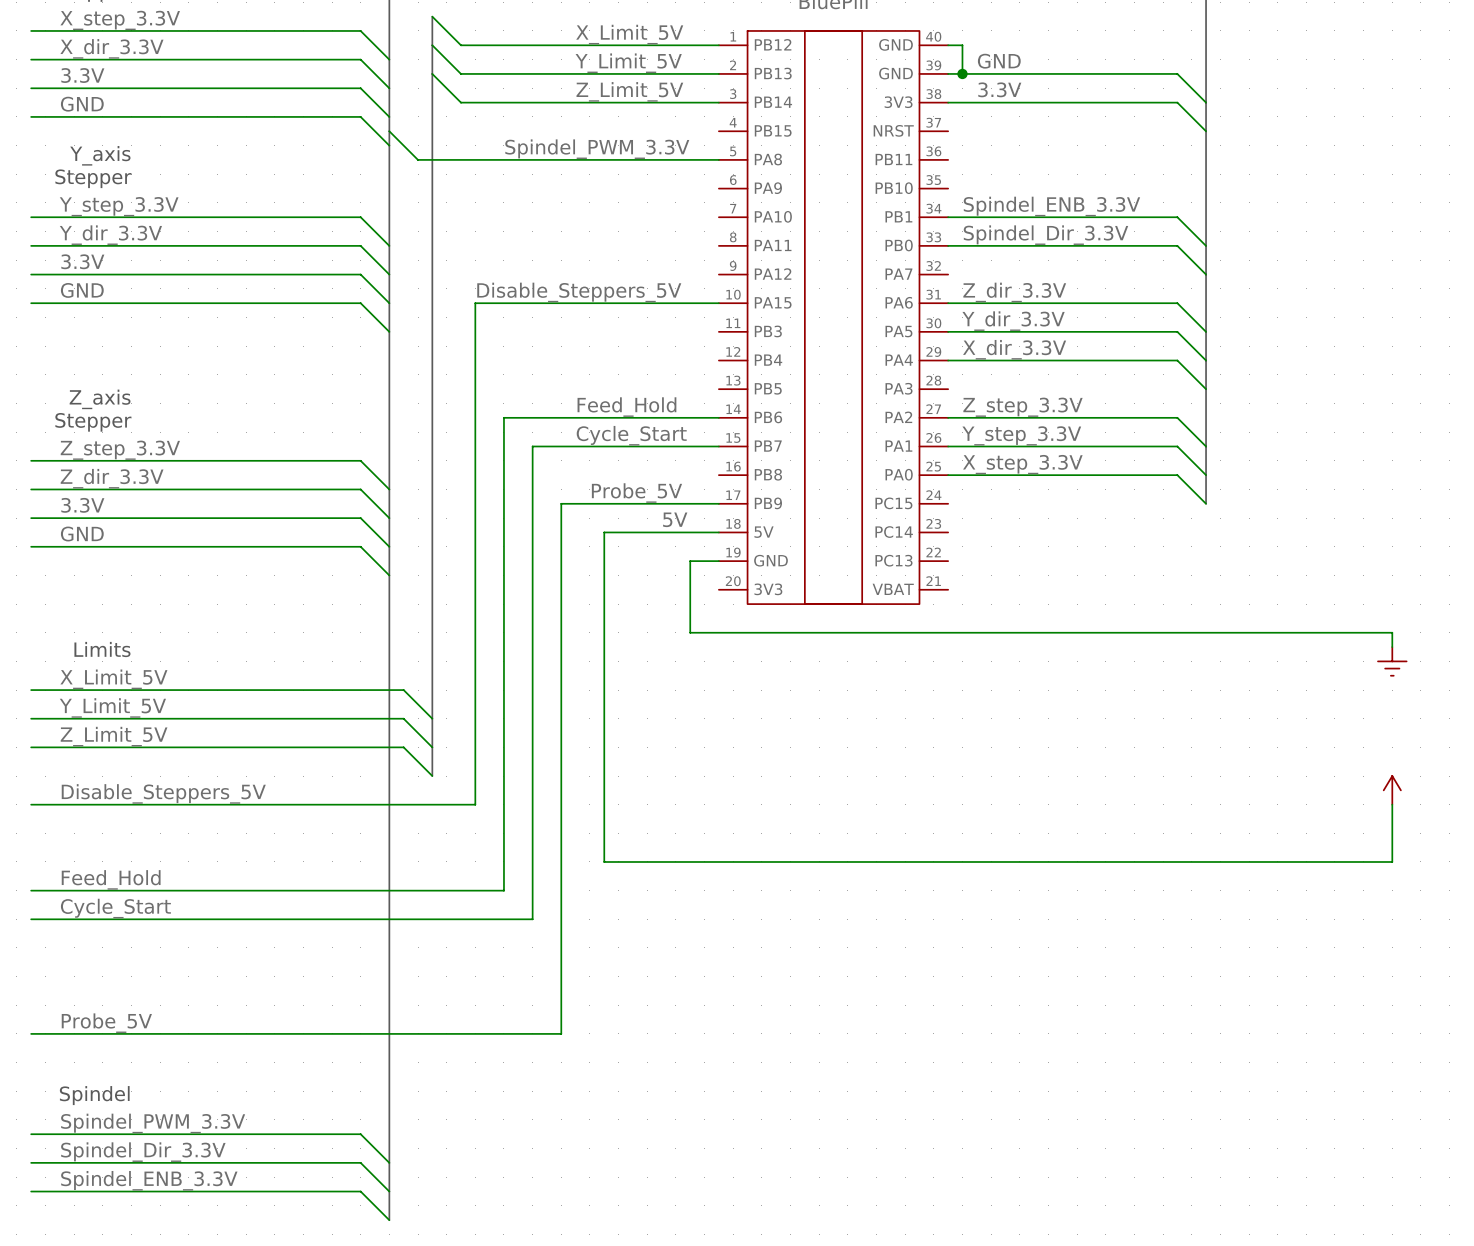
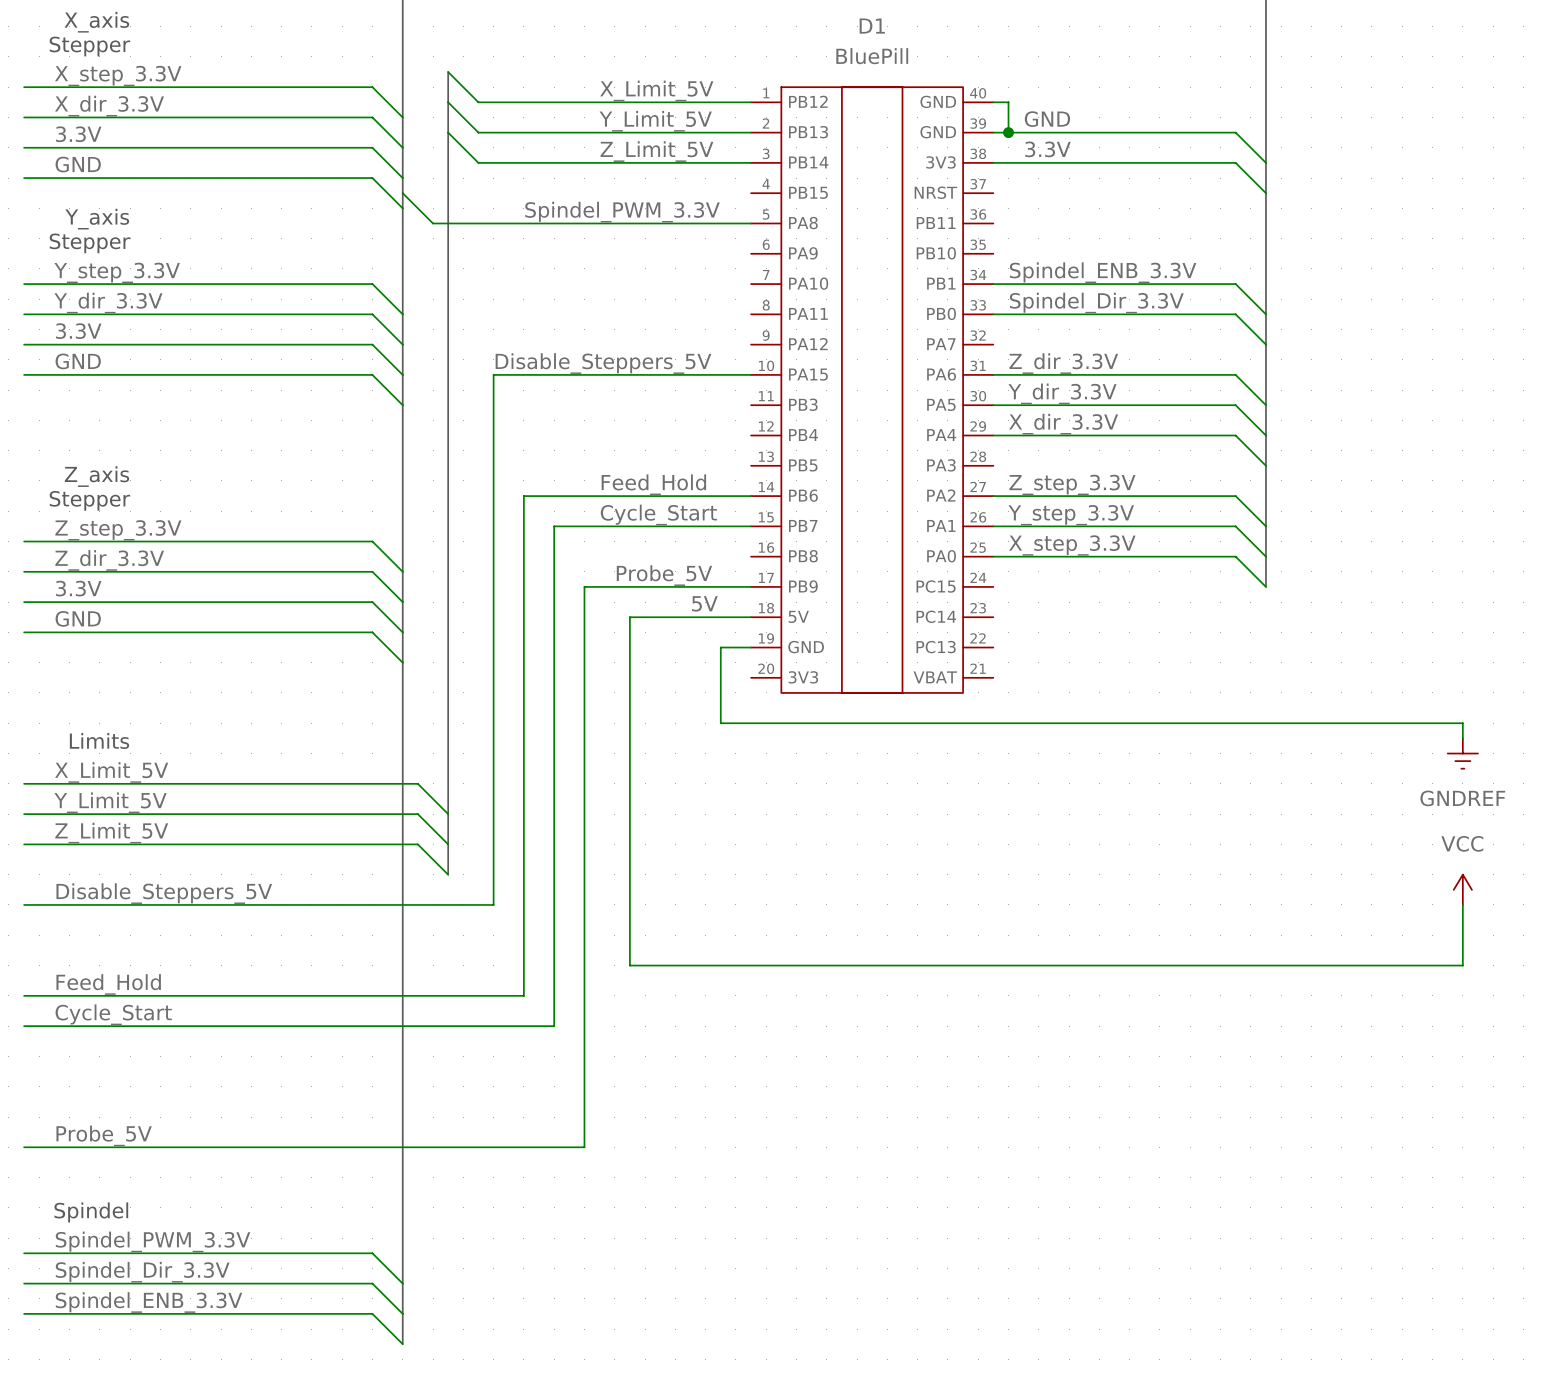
power symbol text: none -> GNDREF (1462, 798)
power symbol text: none -> VCC (1462, 843)

